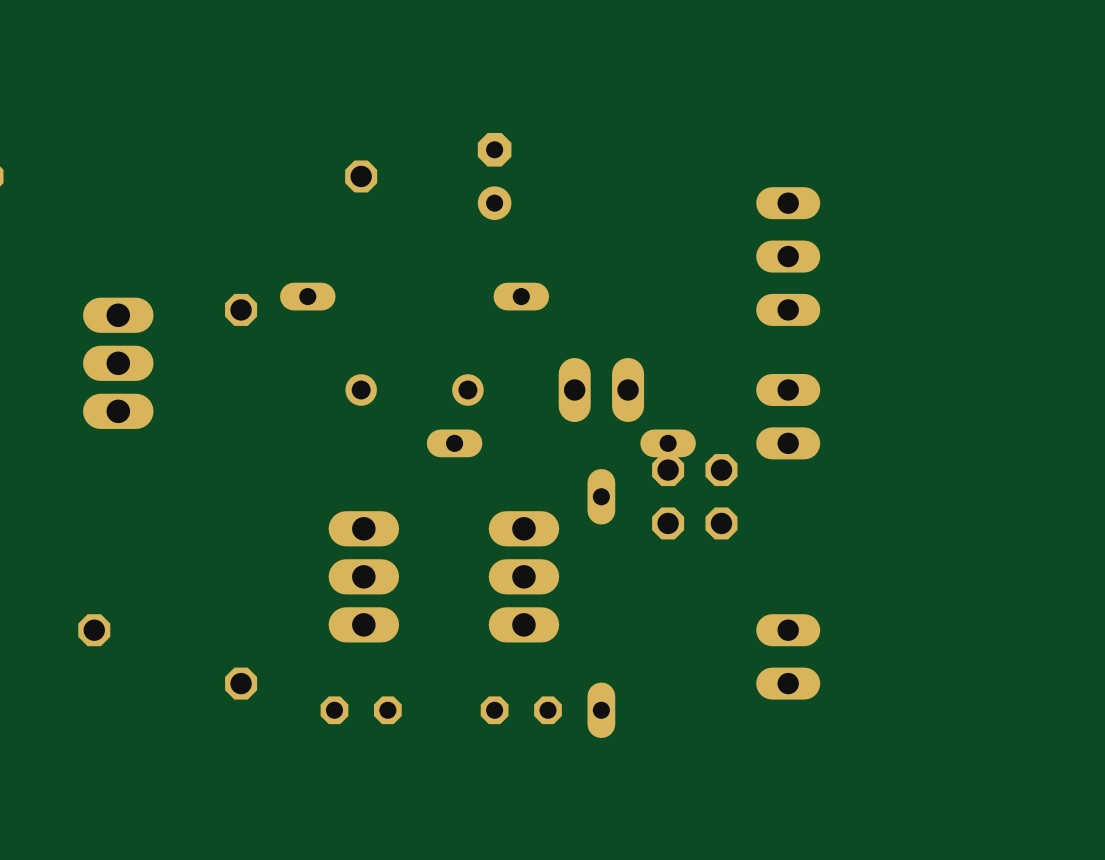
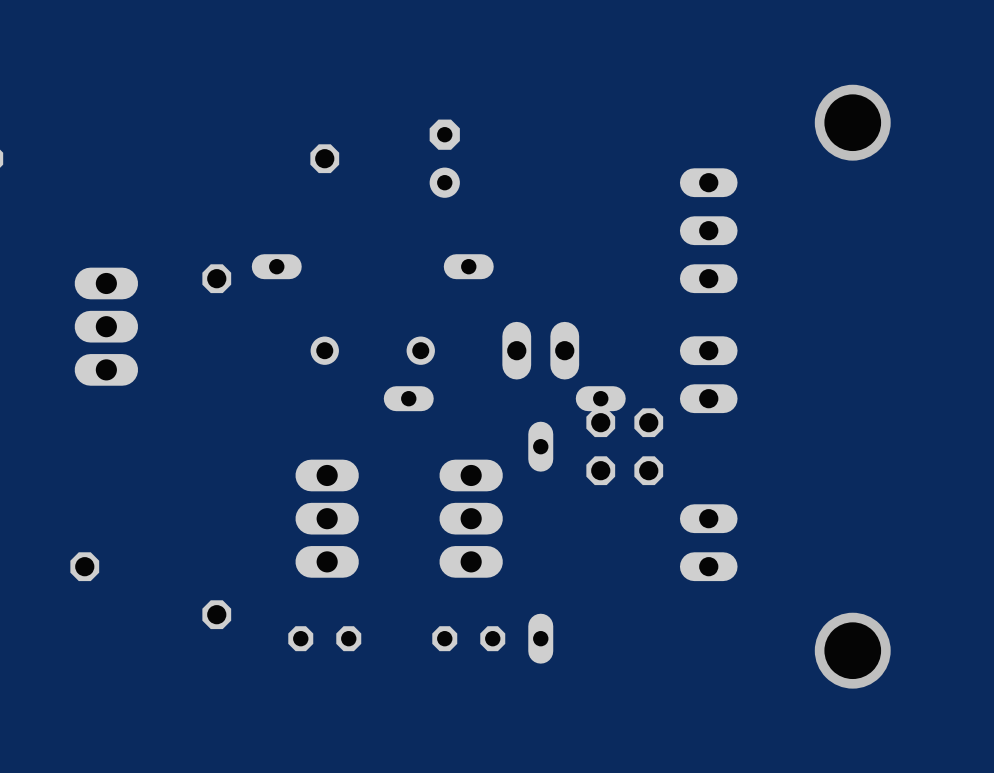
via: none -> (852, 122)
part position: (788, 656) -> (708, 542)
via: none -> (852, 650)

